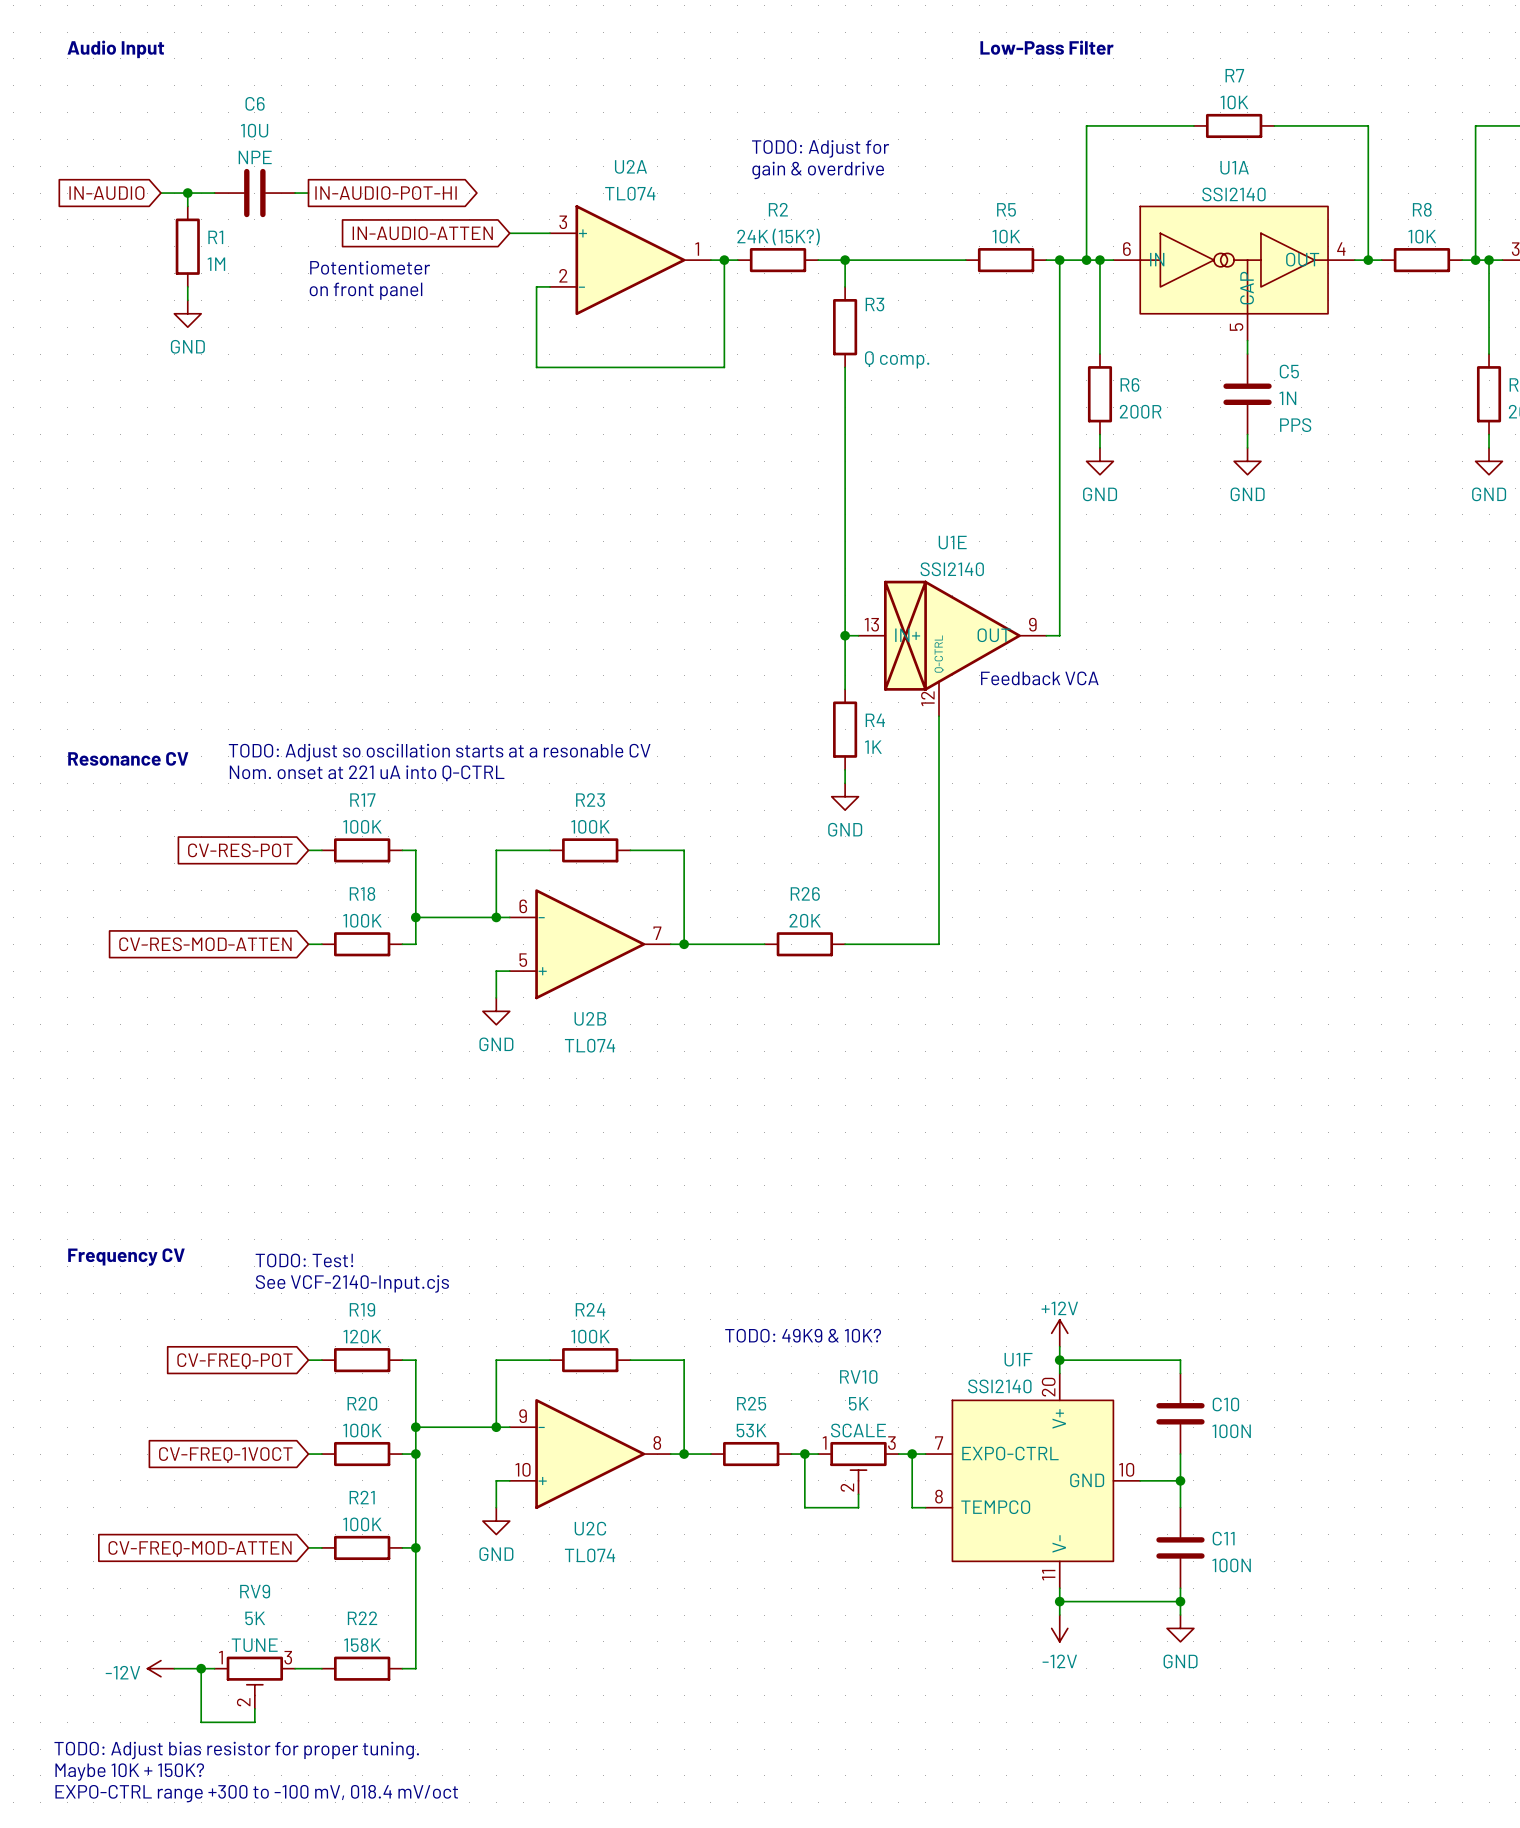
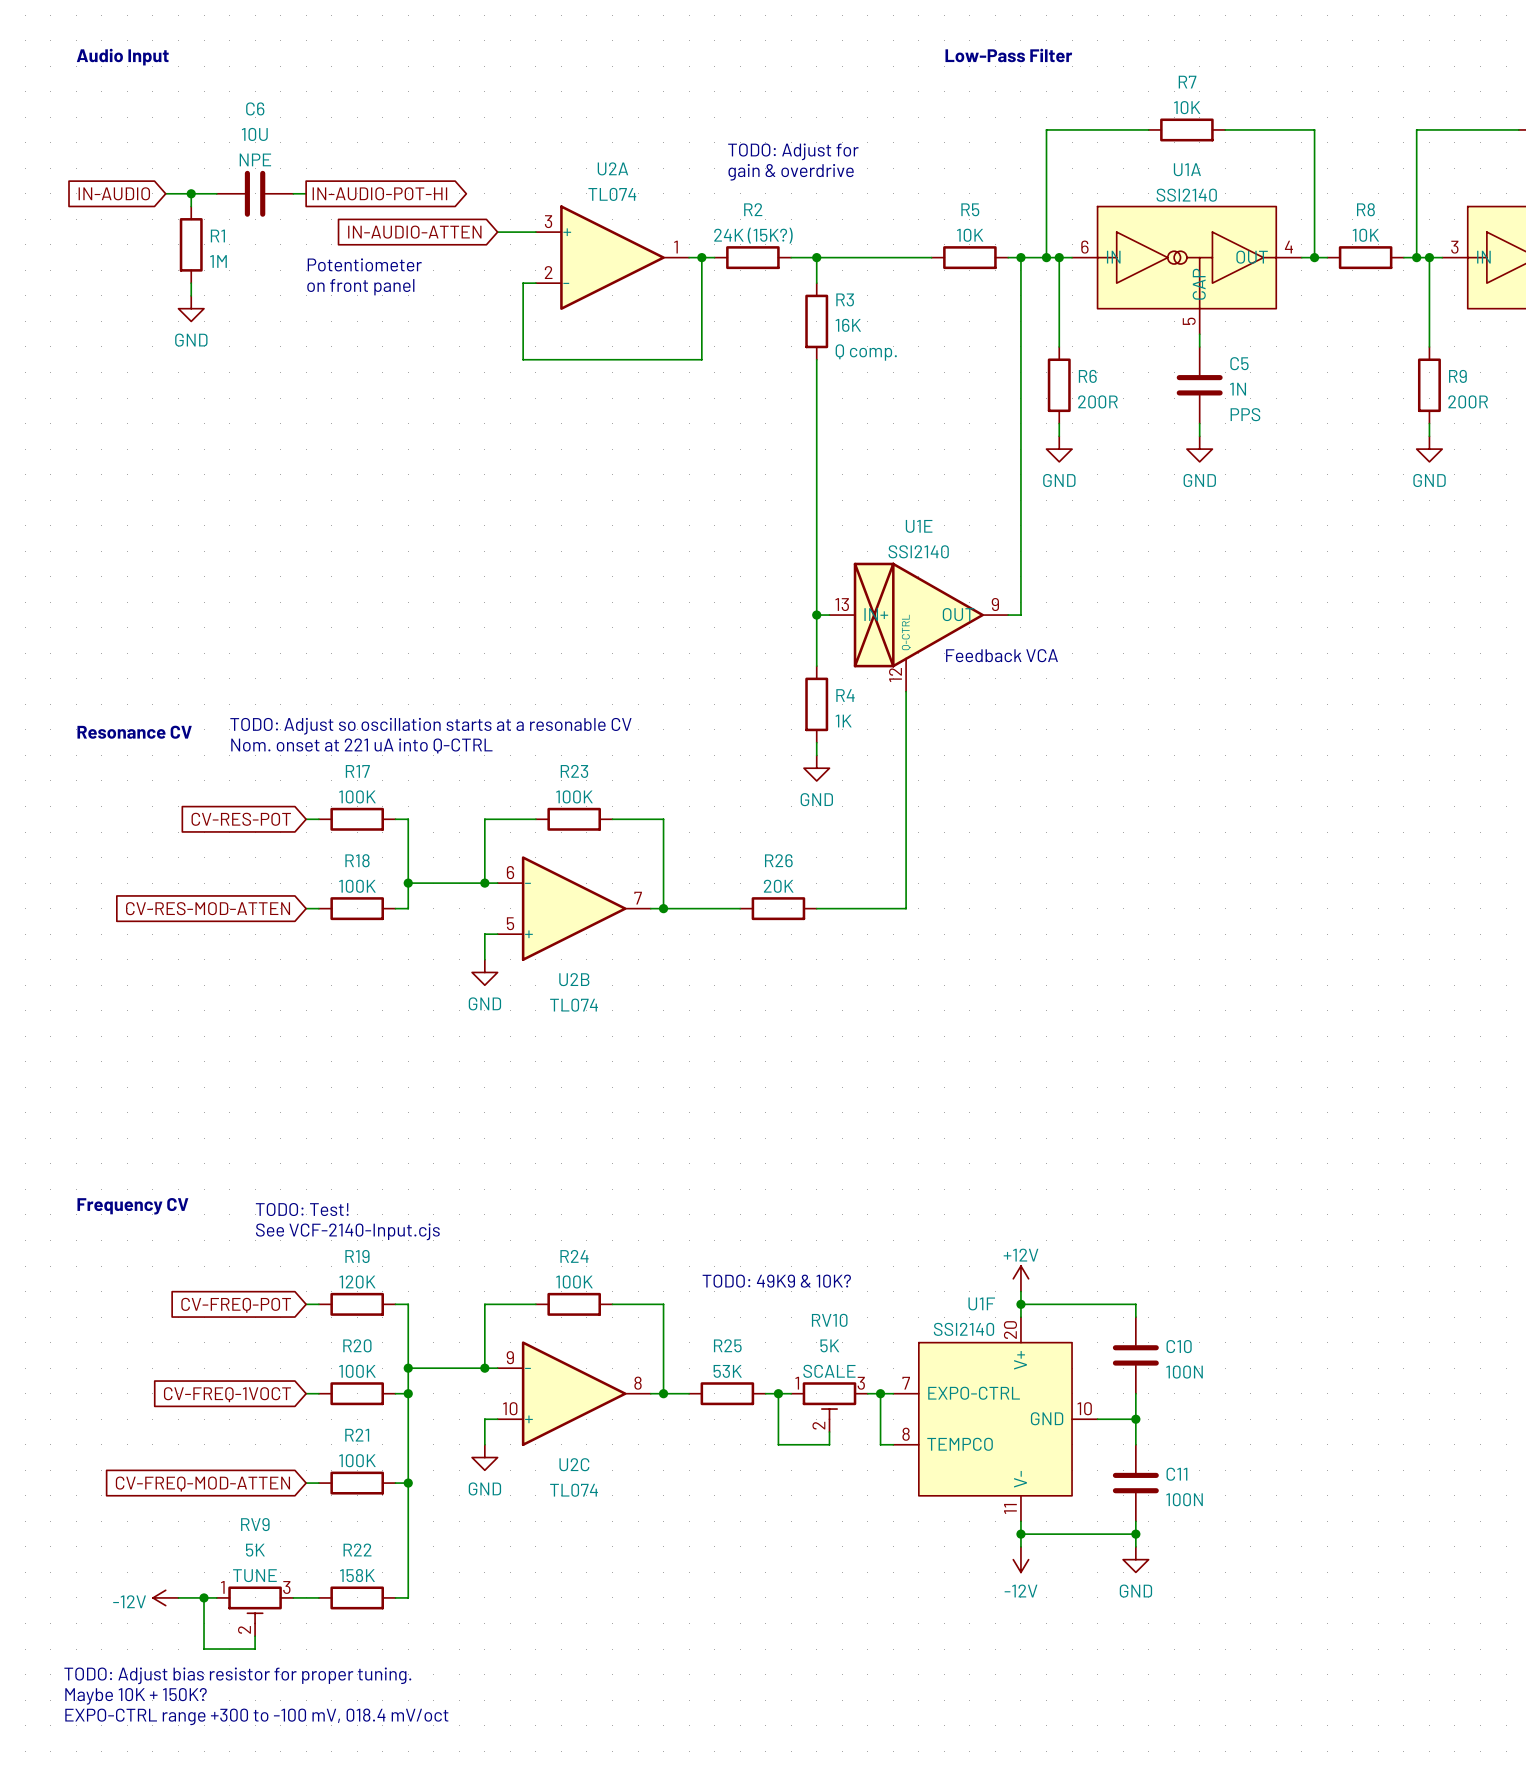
R3 value: none -> 16K (848, 325)

